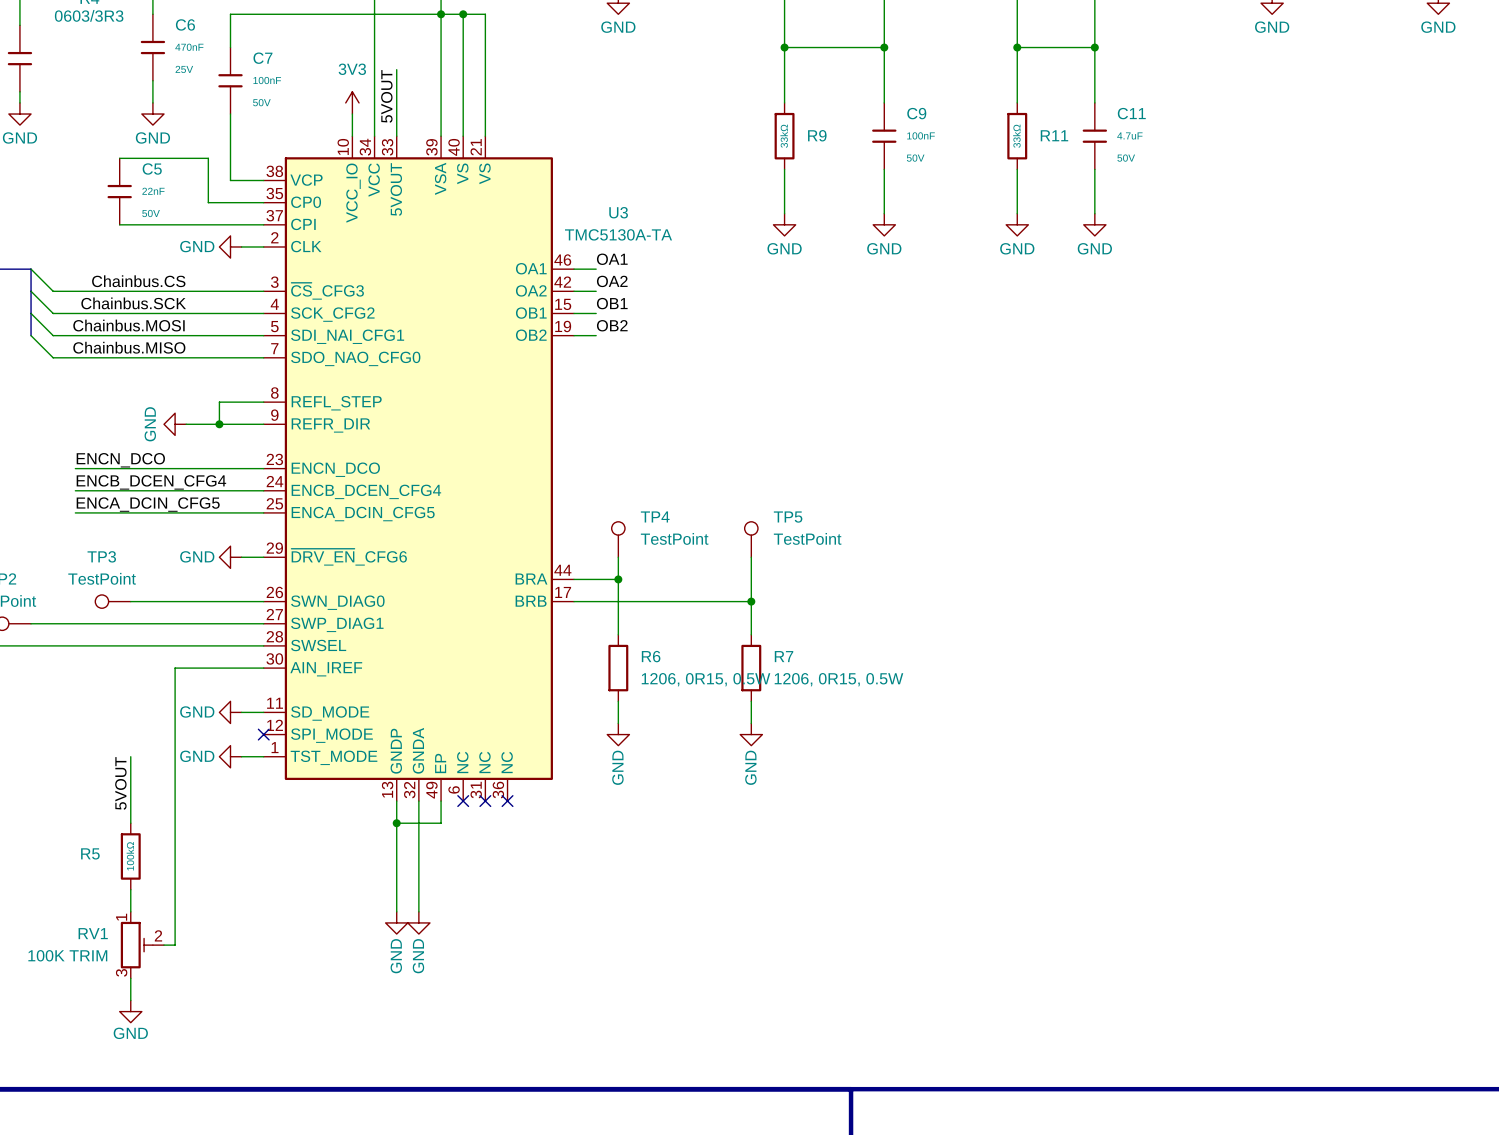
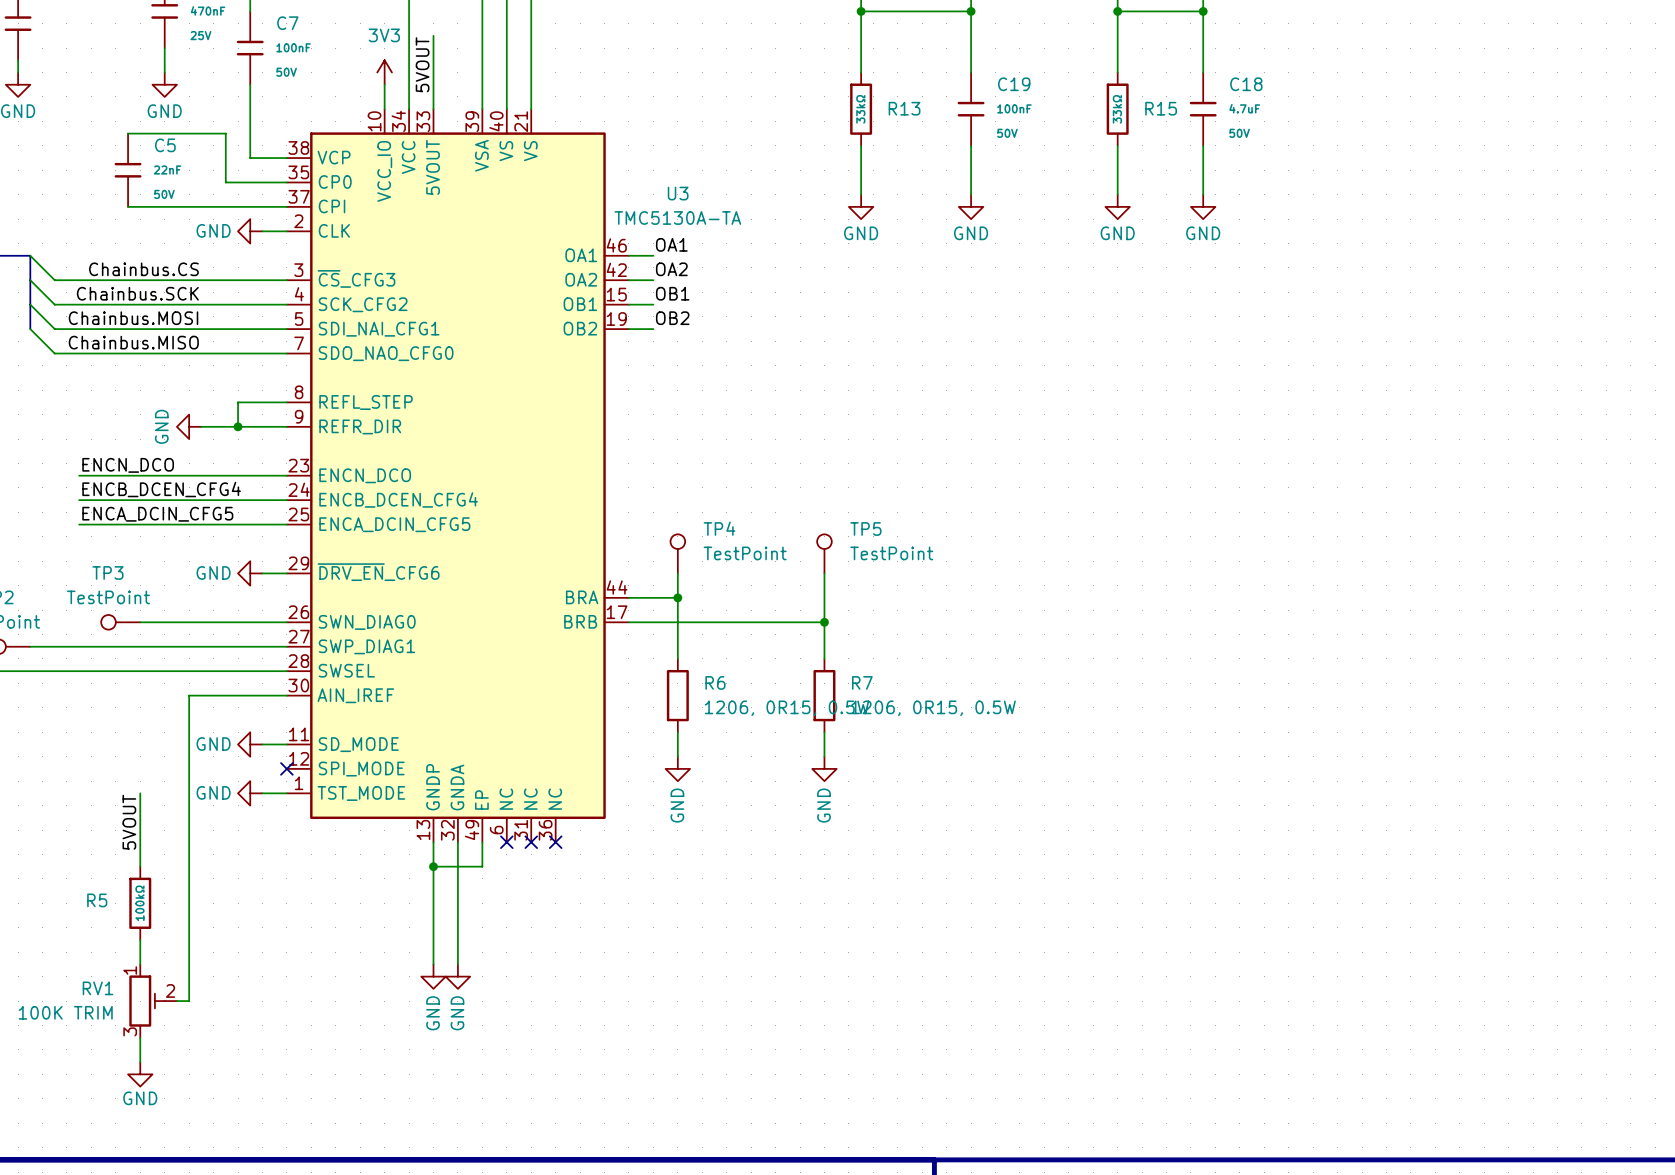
C9 name: C9 (916, 113) -> C19 (1014, 84)
C11 name: C11 (1131, 113) -> C18 (1246, 84)
R9 name: R9 (817, 135) -> R13 (904, 108)
R11 name: R11 (1054, 135) -> R15 (1161, 108)

